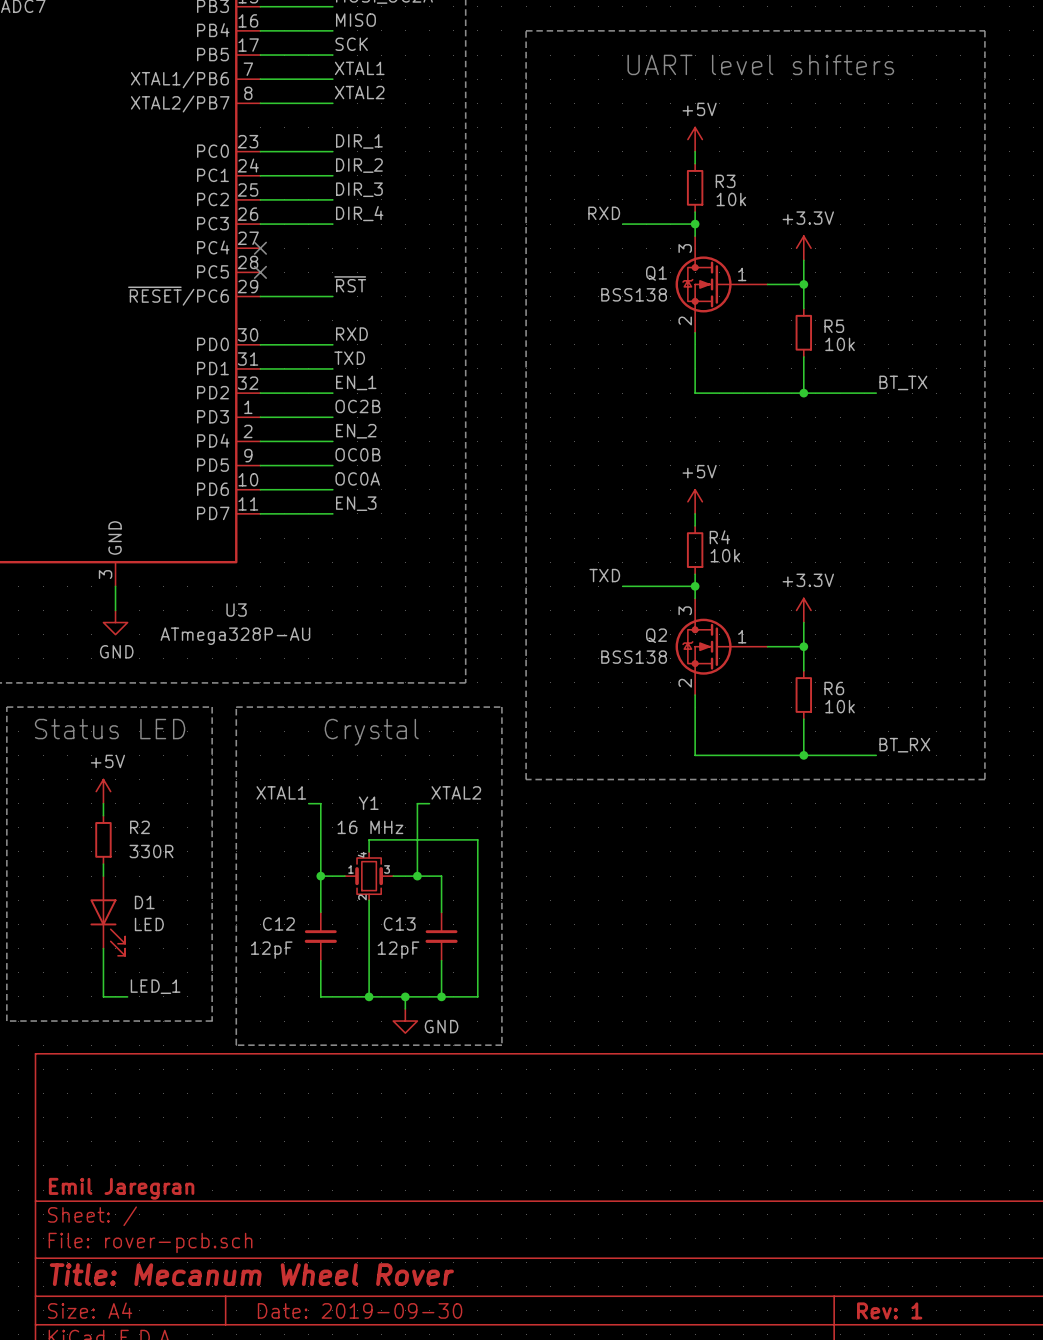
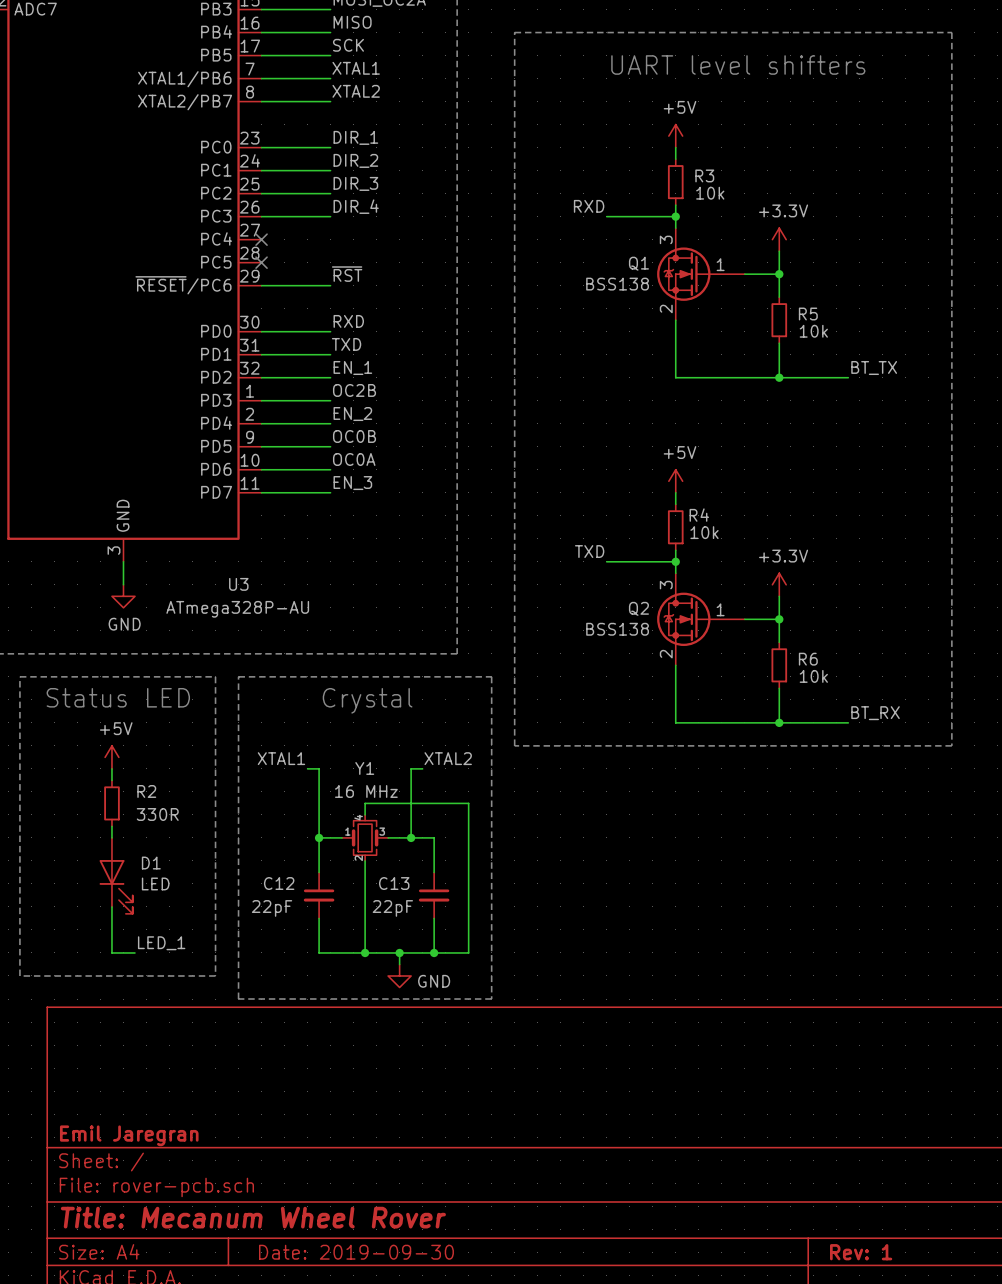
C12 value: 12pF (271, 950) -> 22pF (272, 908)
C13 value: 12pF (398, 950) -> 22pF (392, 908)

